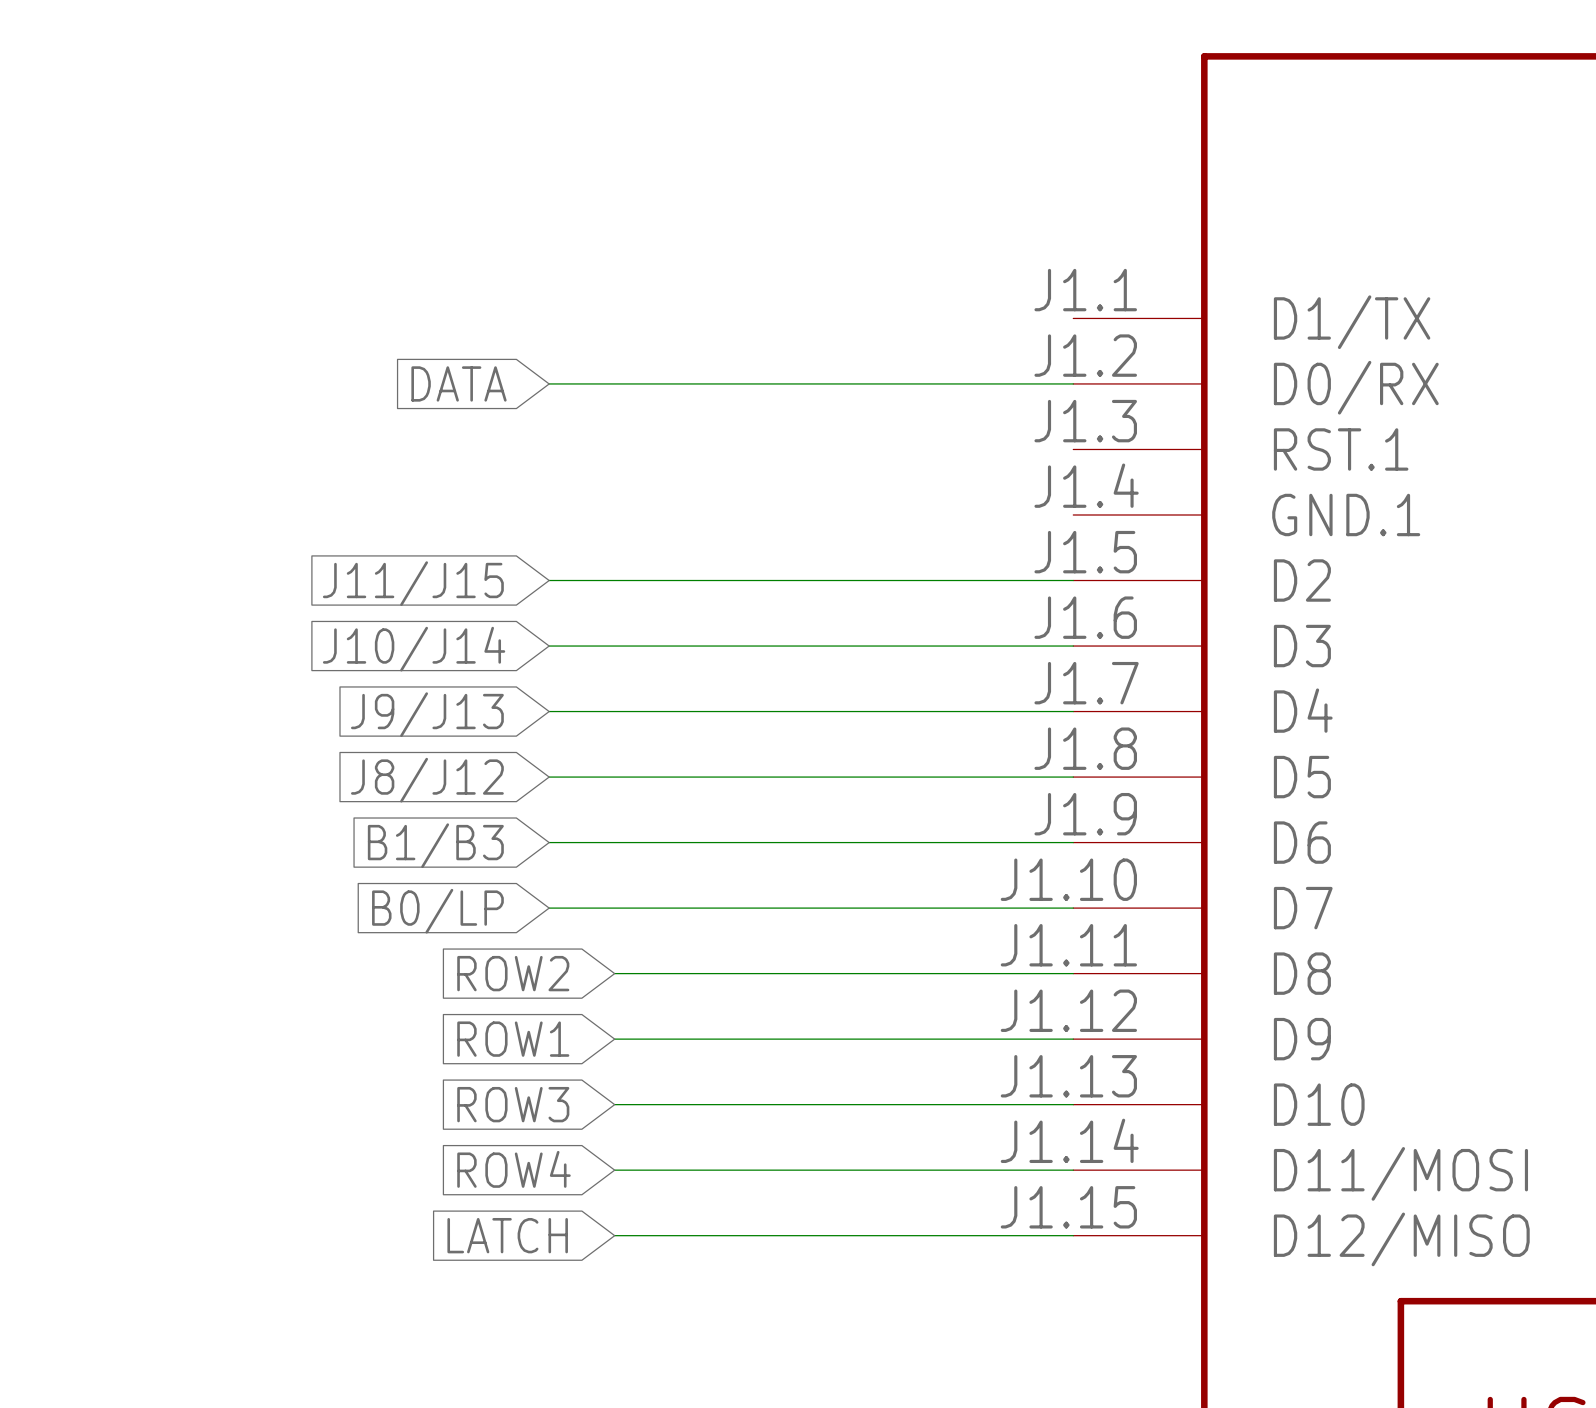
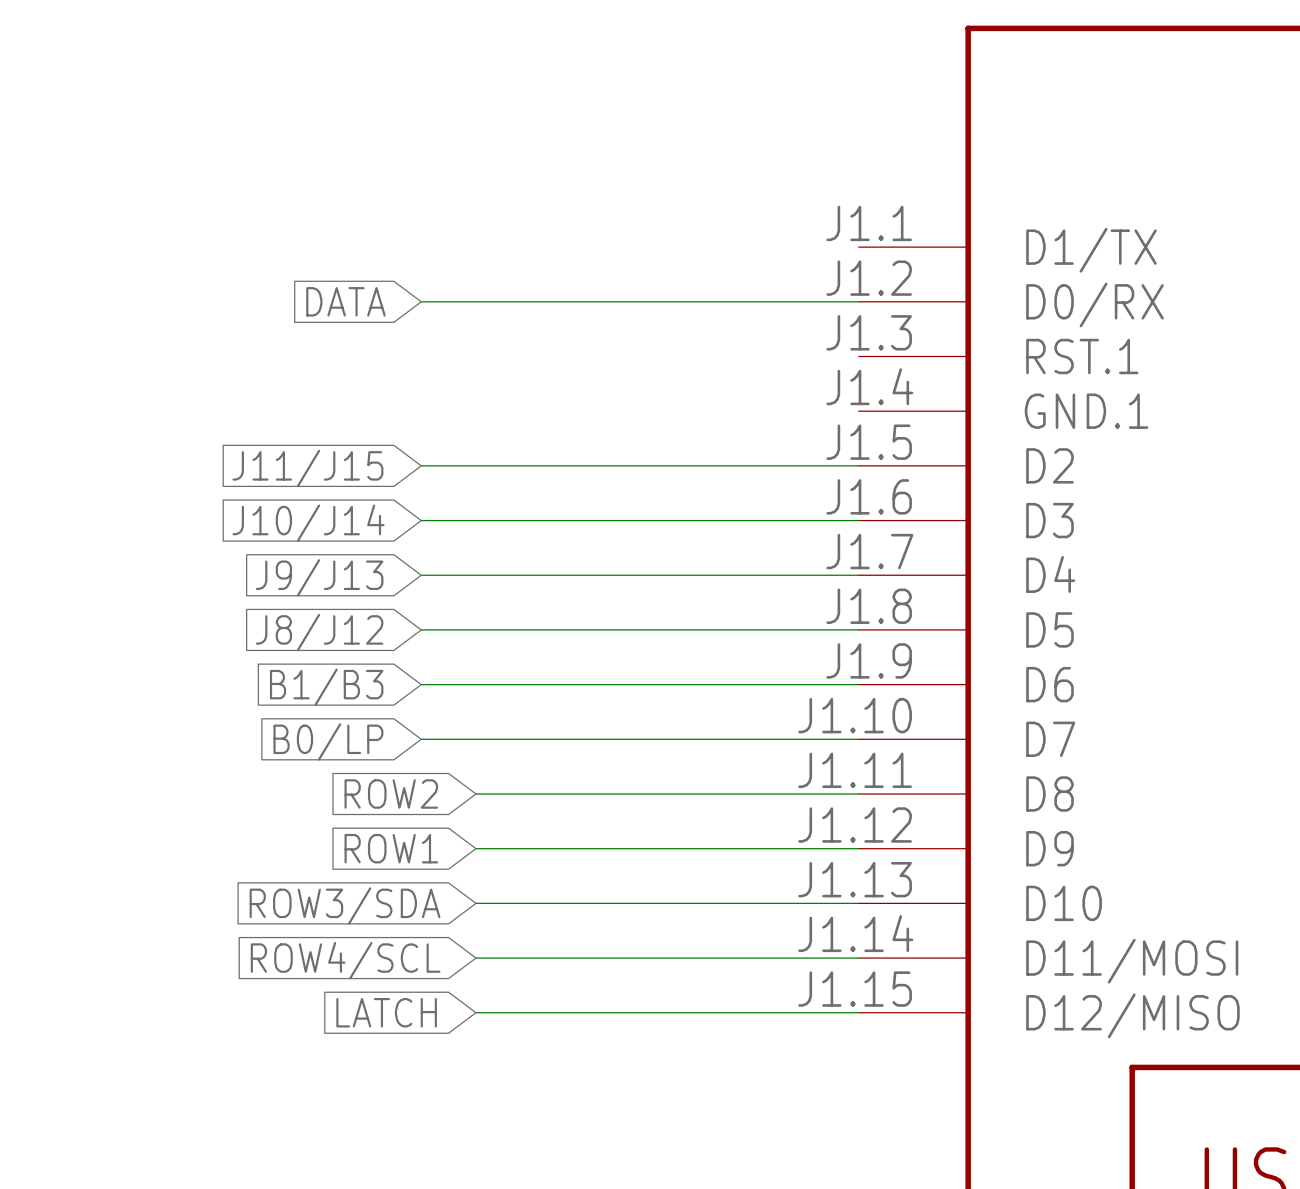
global label: ROW3 (513, 1104) -> ROW3/SDA (345, 905)
global label: ROW4 (513, 1169) -> ROW4/SCL (345, 960)

